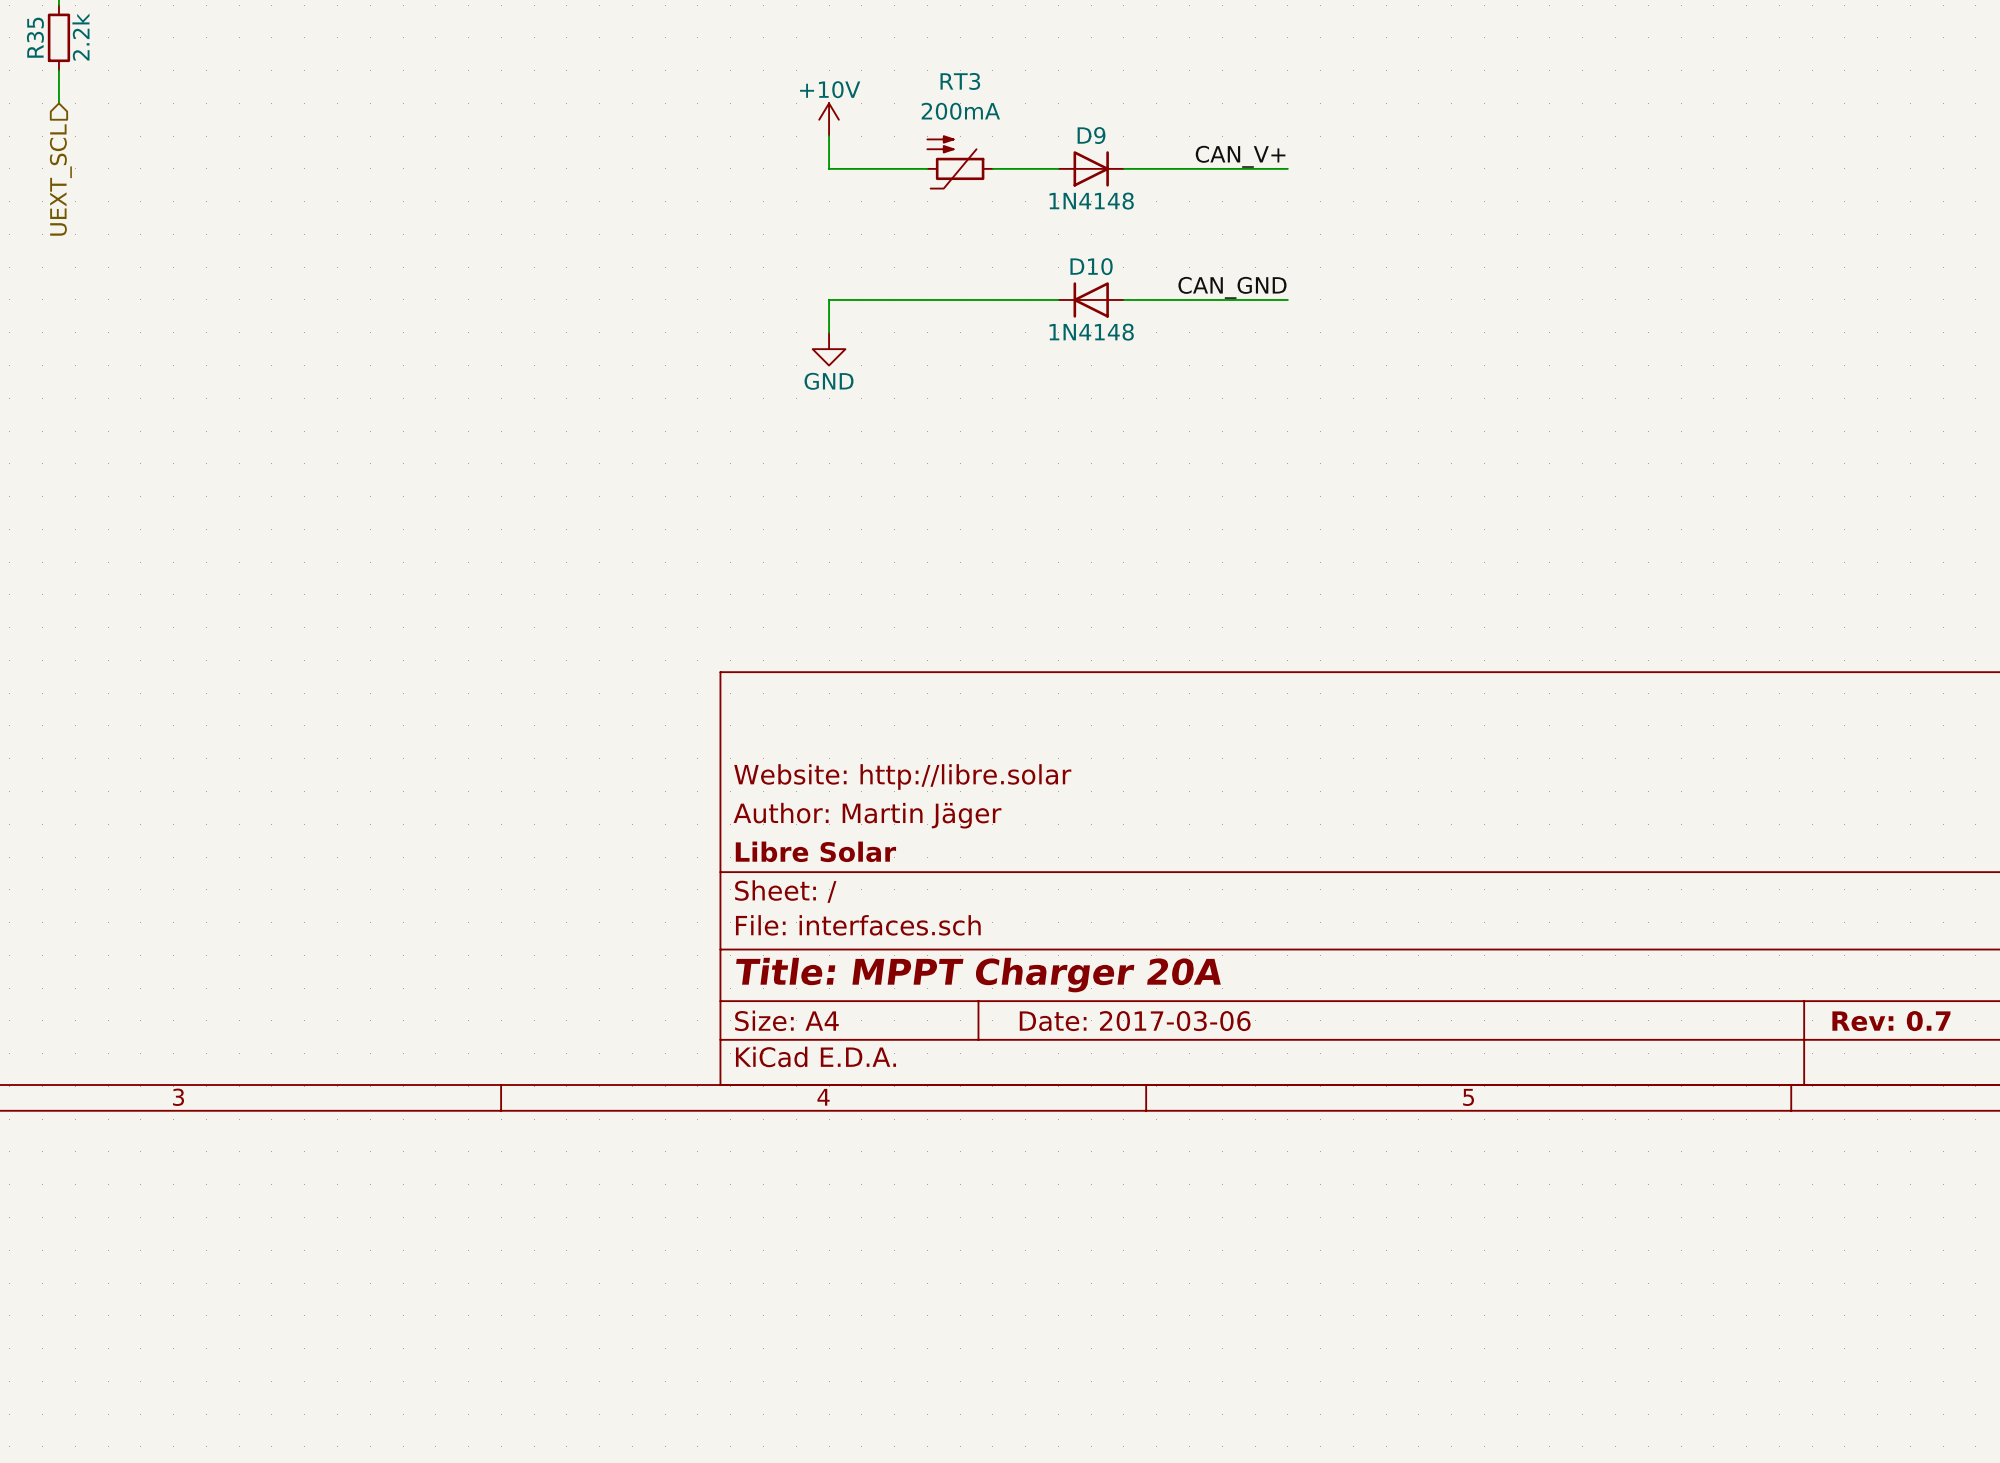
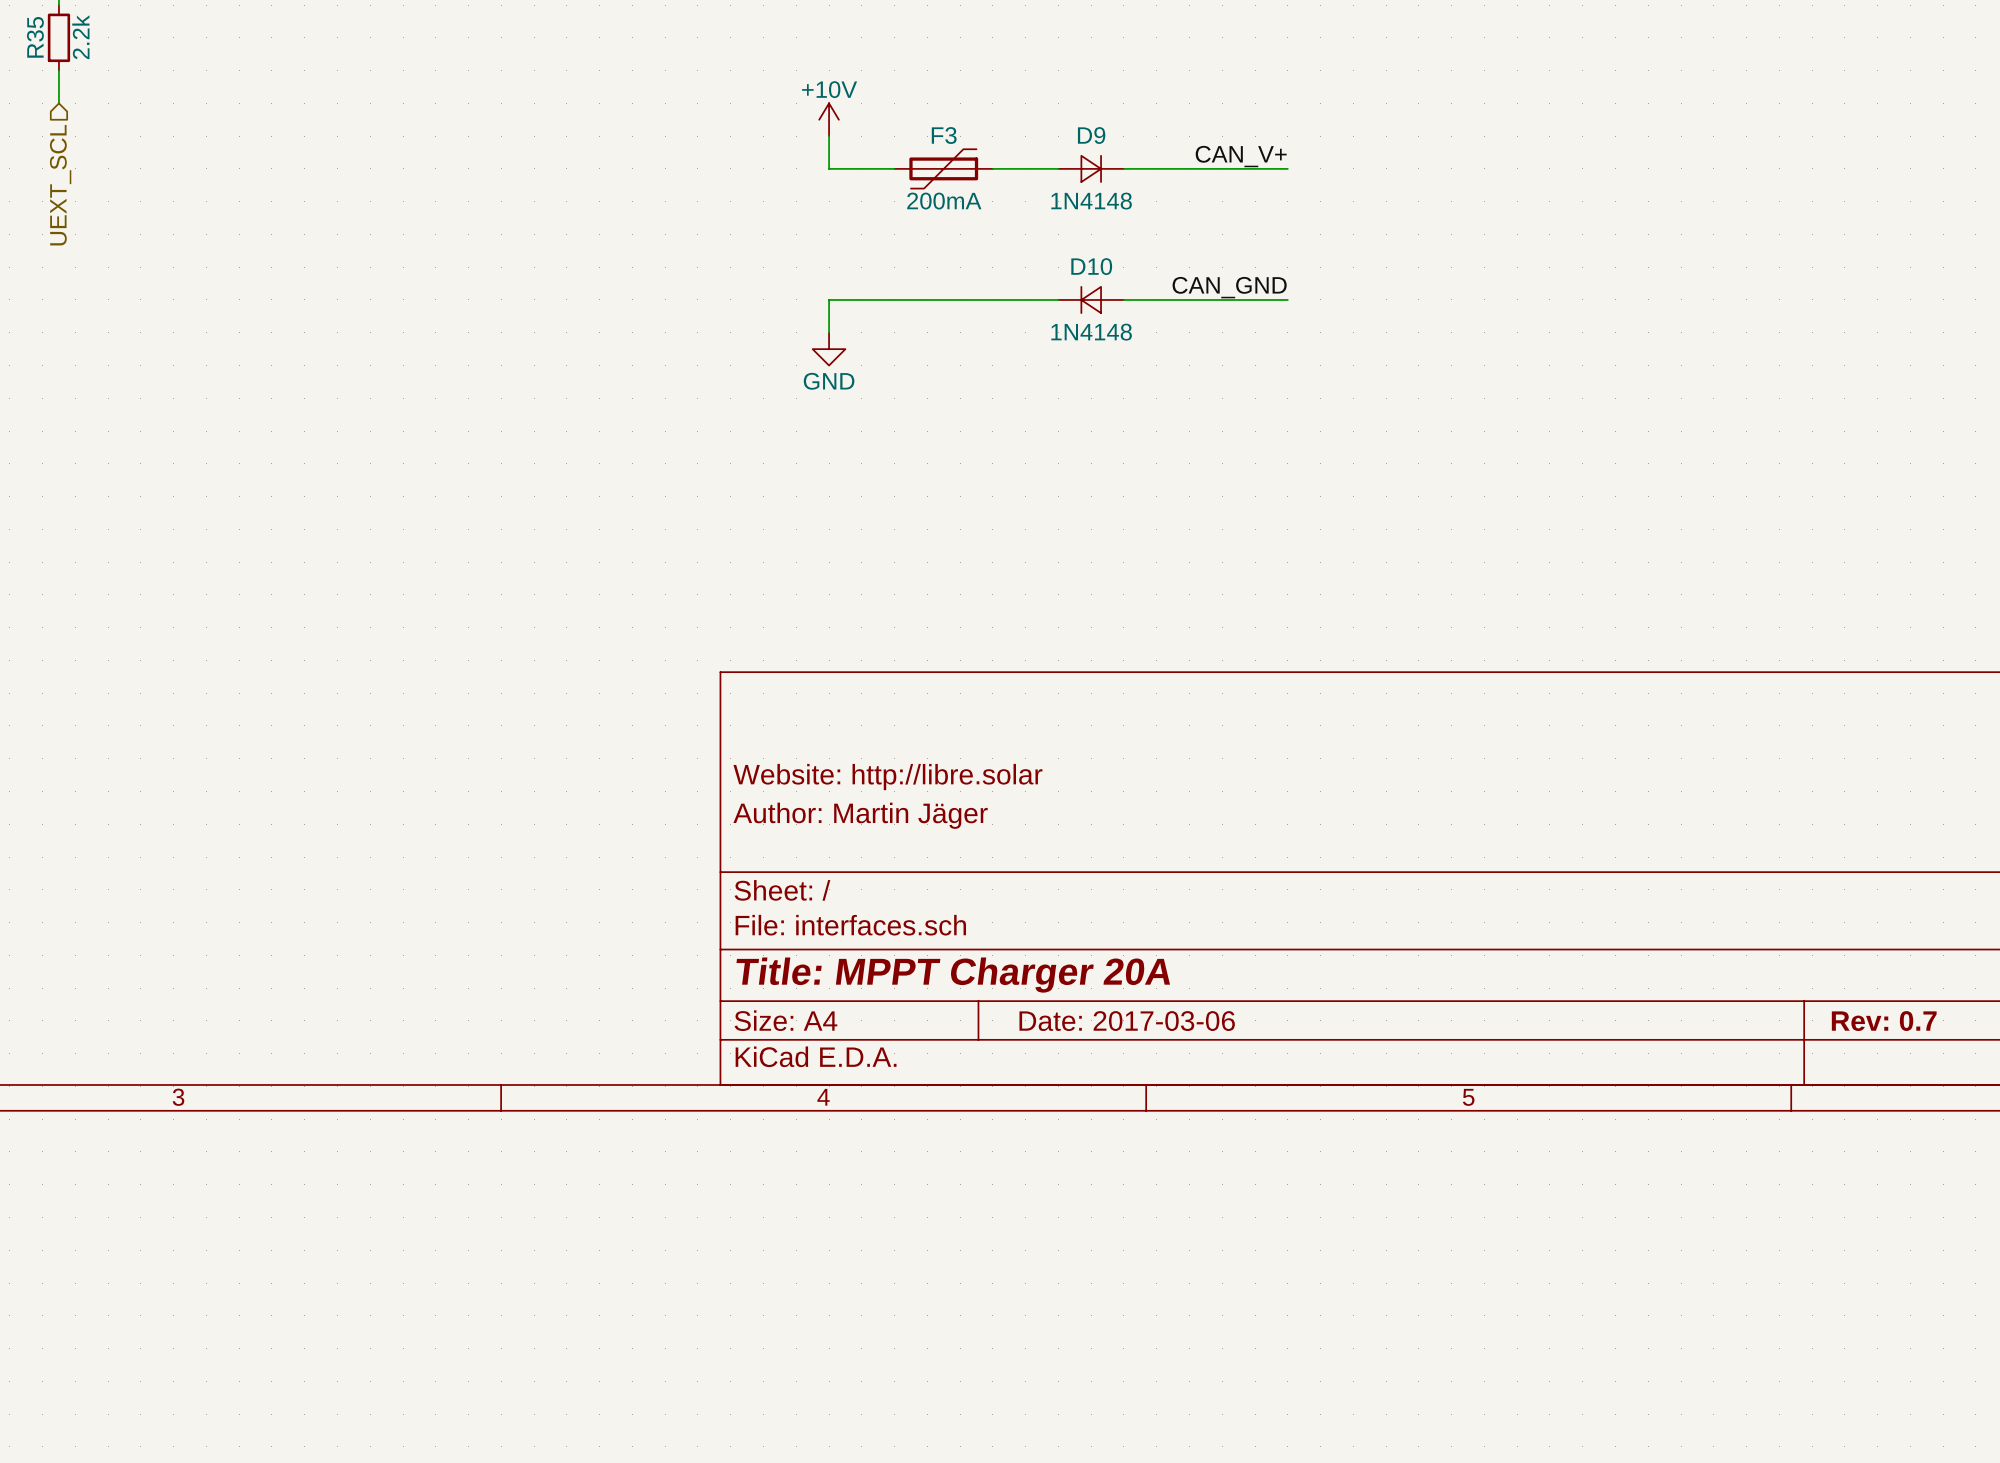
D9 symbol: [1058, 151, 1124, 187] -> [1058, 155, 1124, 183]
RT3: 200mA (960, 162) -> none
F3: none -> 200mA (943, 168)
D10 symbol: [1058, 282, 1124, 318] -> [1058, 286, 1124, 314]
title block: Libre Solar (815, 851) -> none

